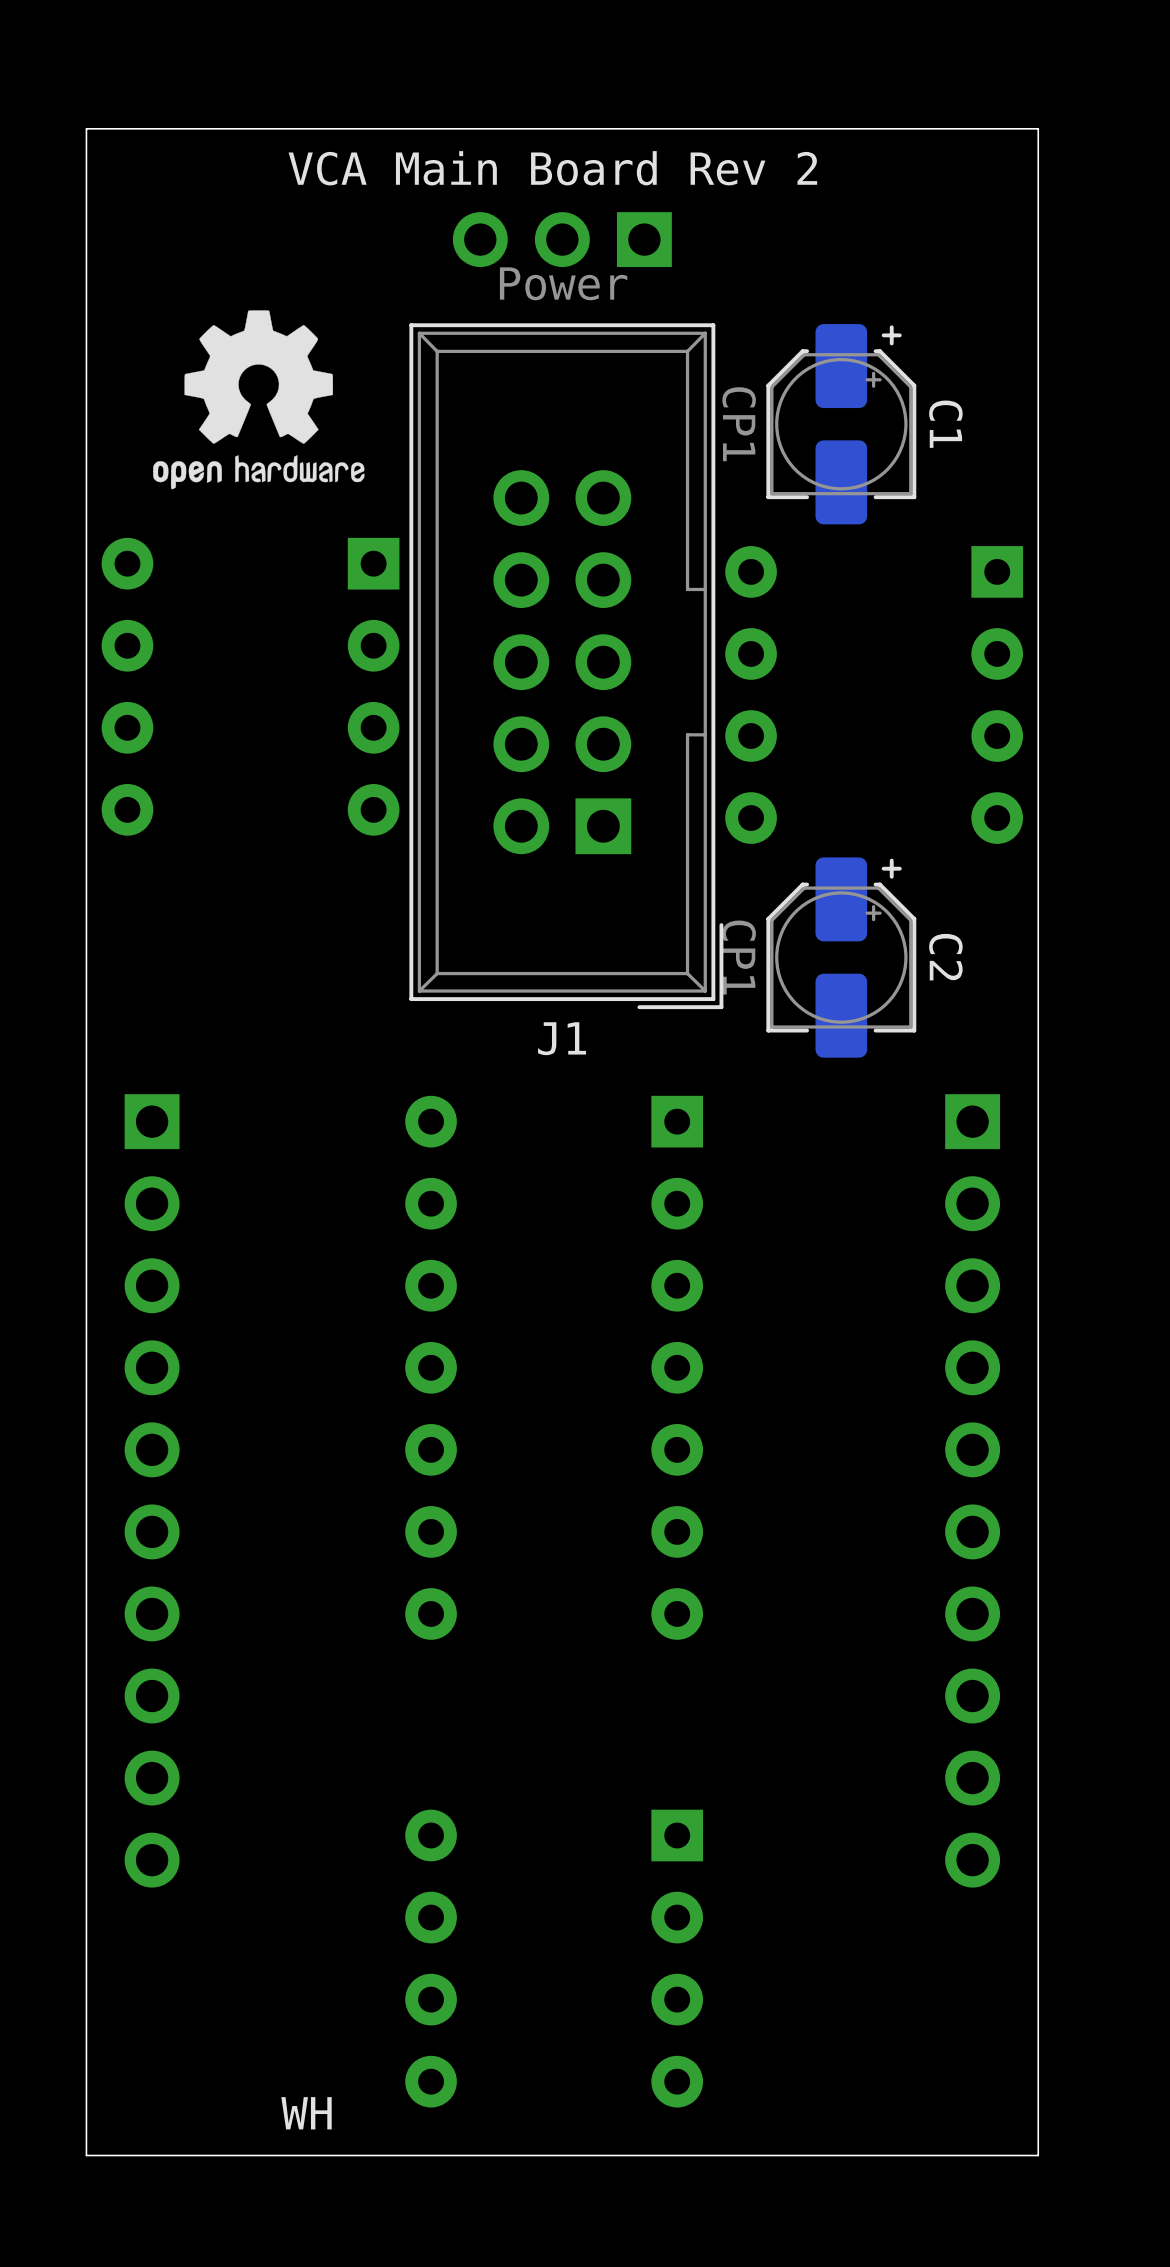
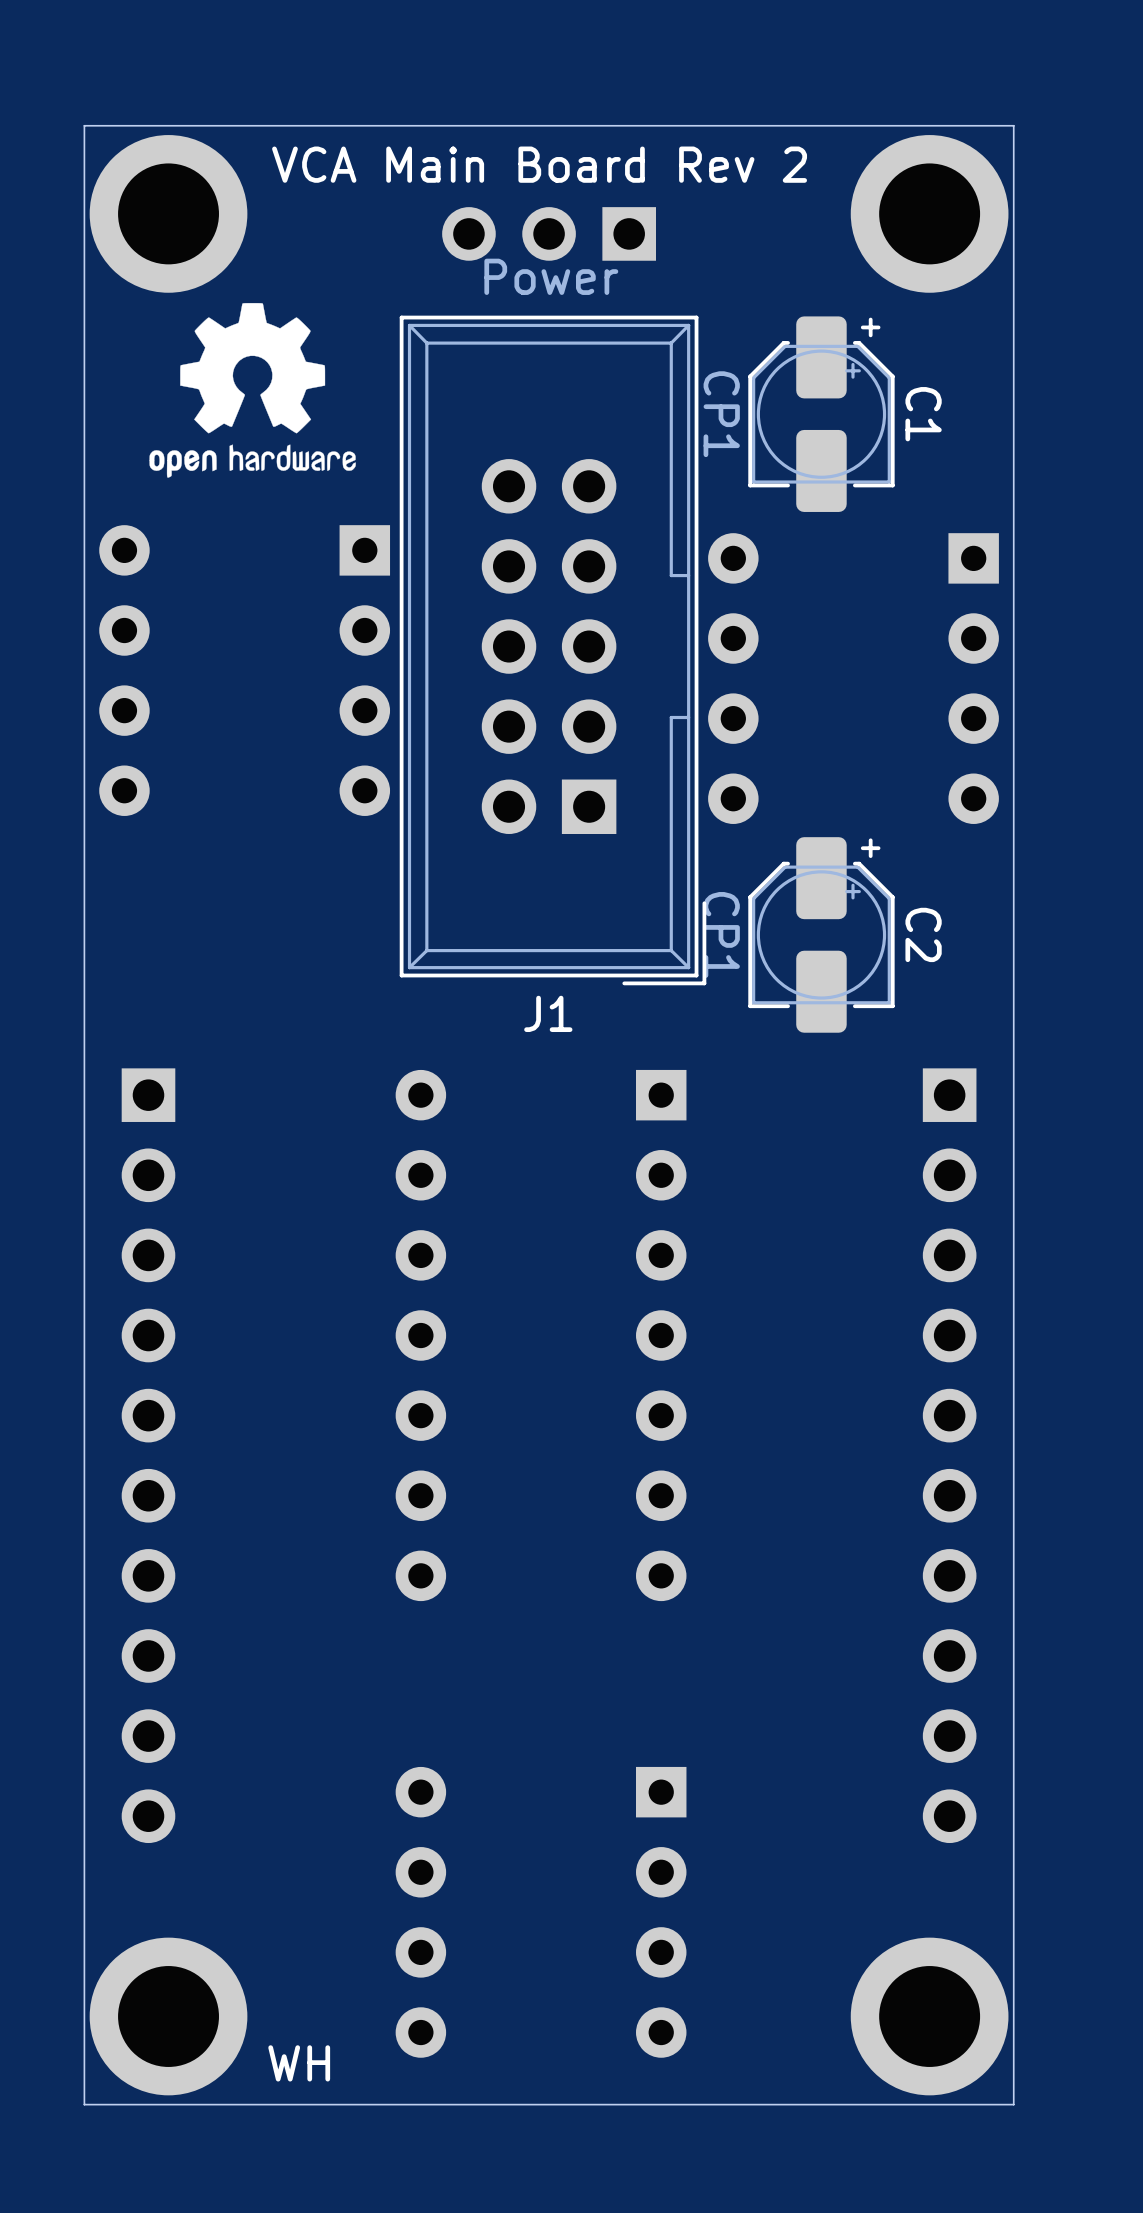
part: none -> (168, 213)
part: none -> (929, 213)
part: none -> (168, 2016)
part: none -> (929, 2016)

